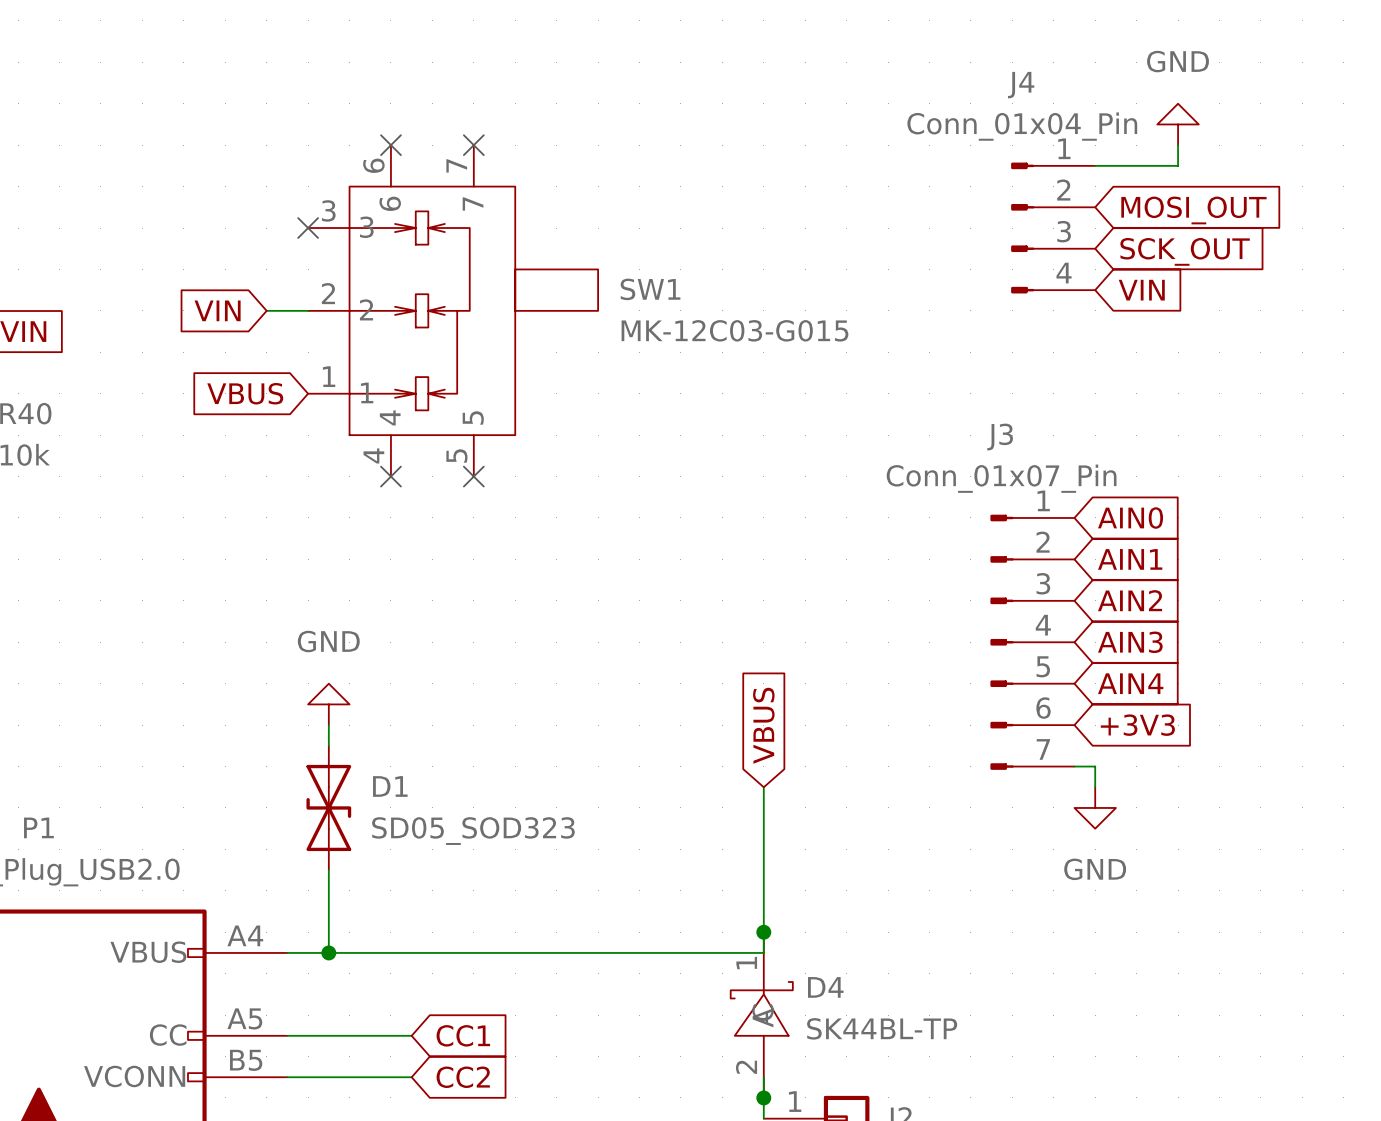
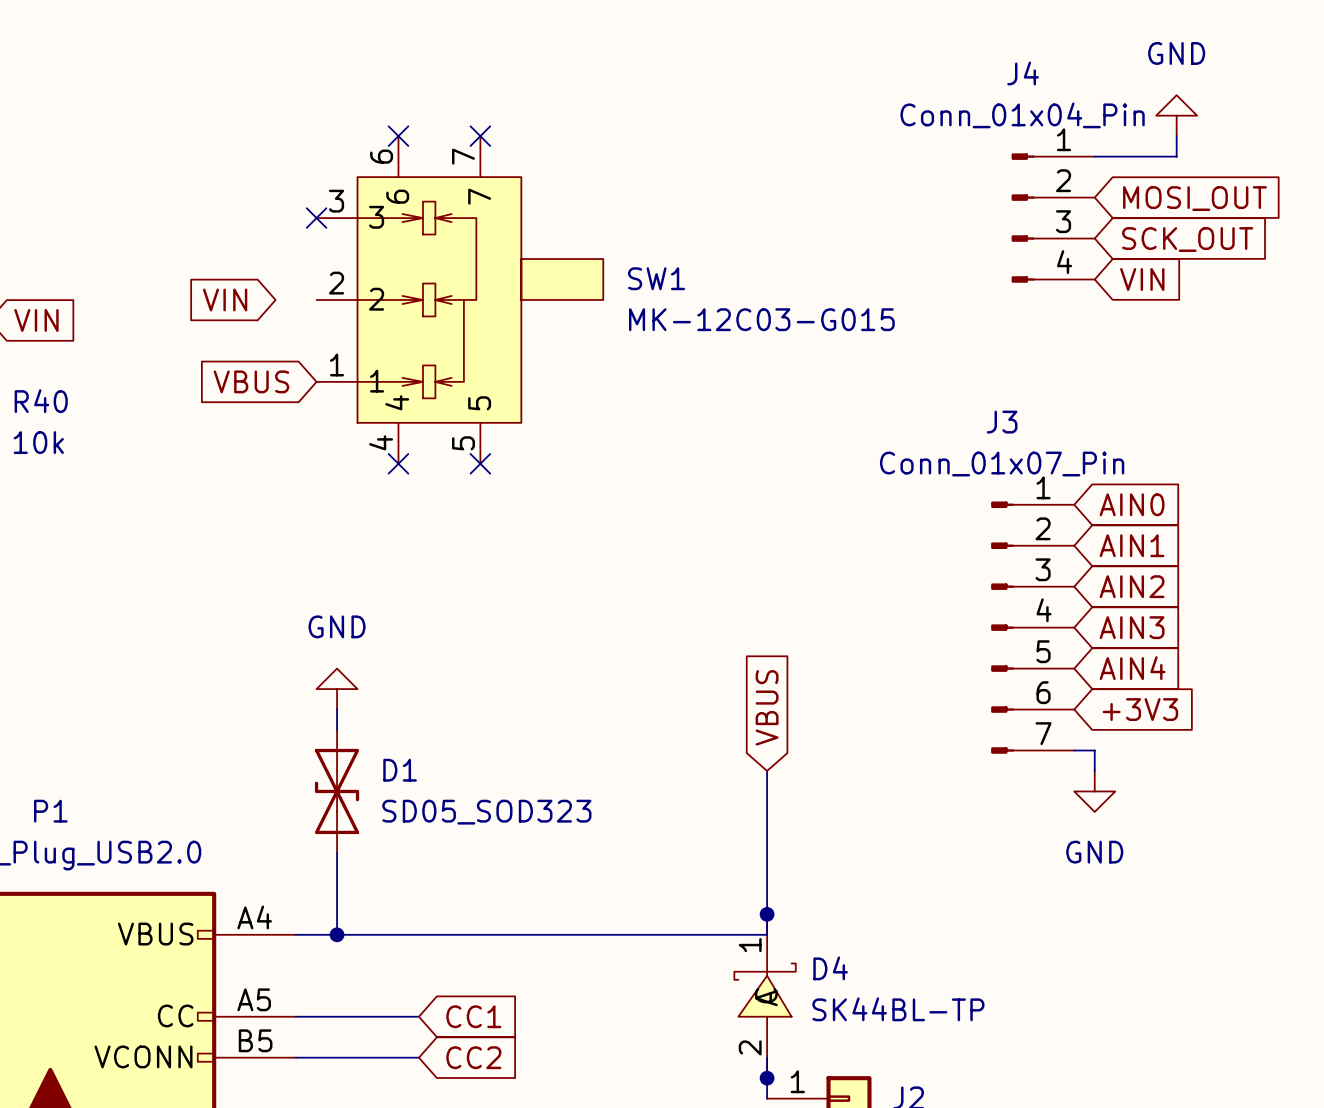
wire: (266, 310) (308, 310) -> none

